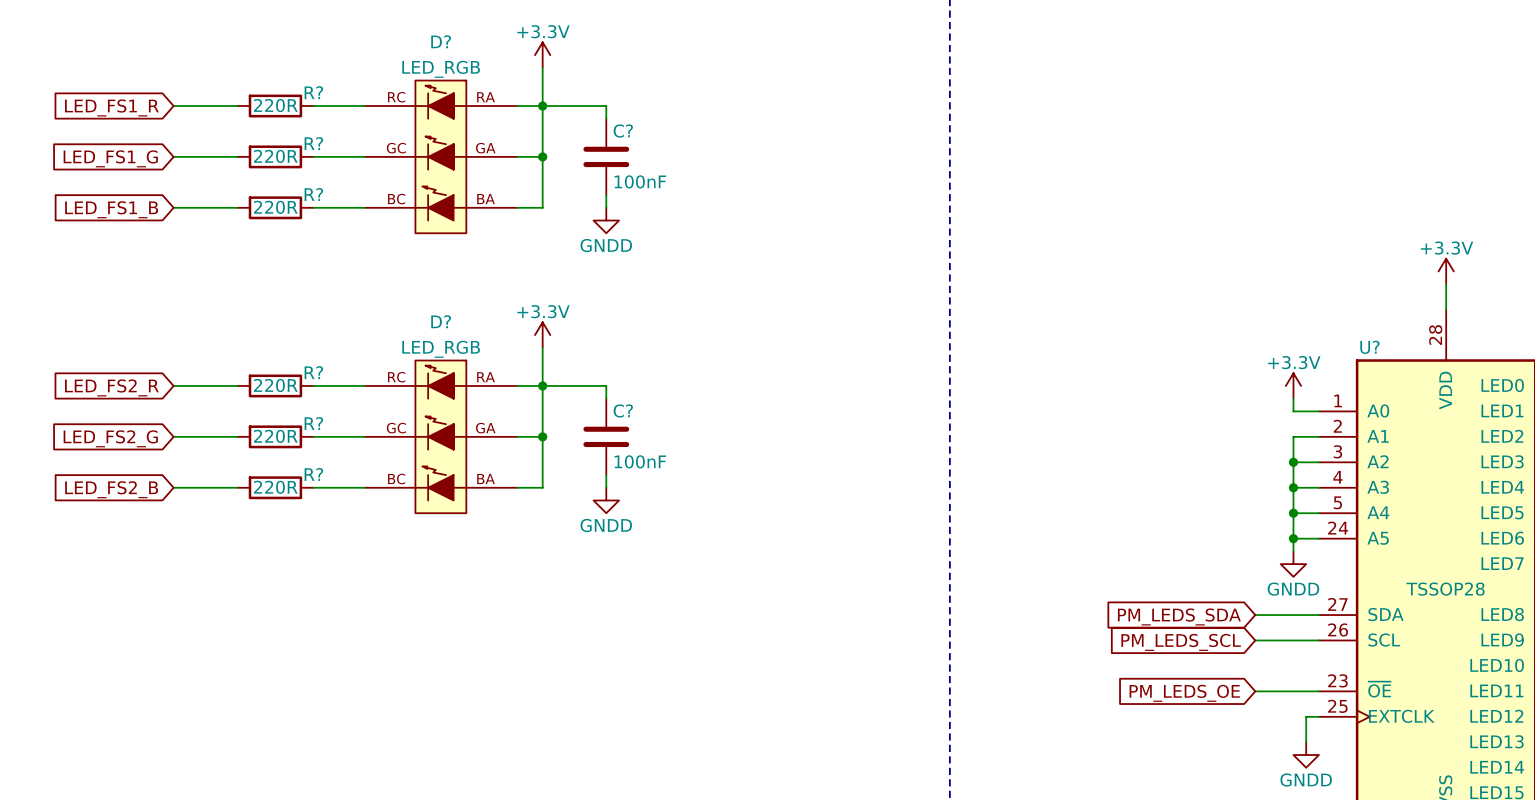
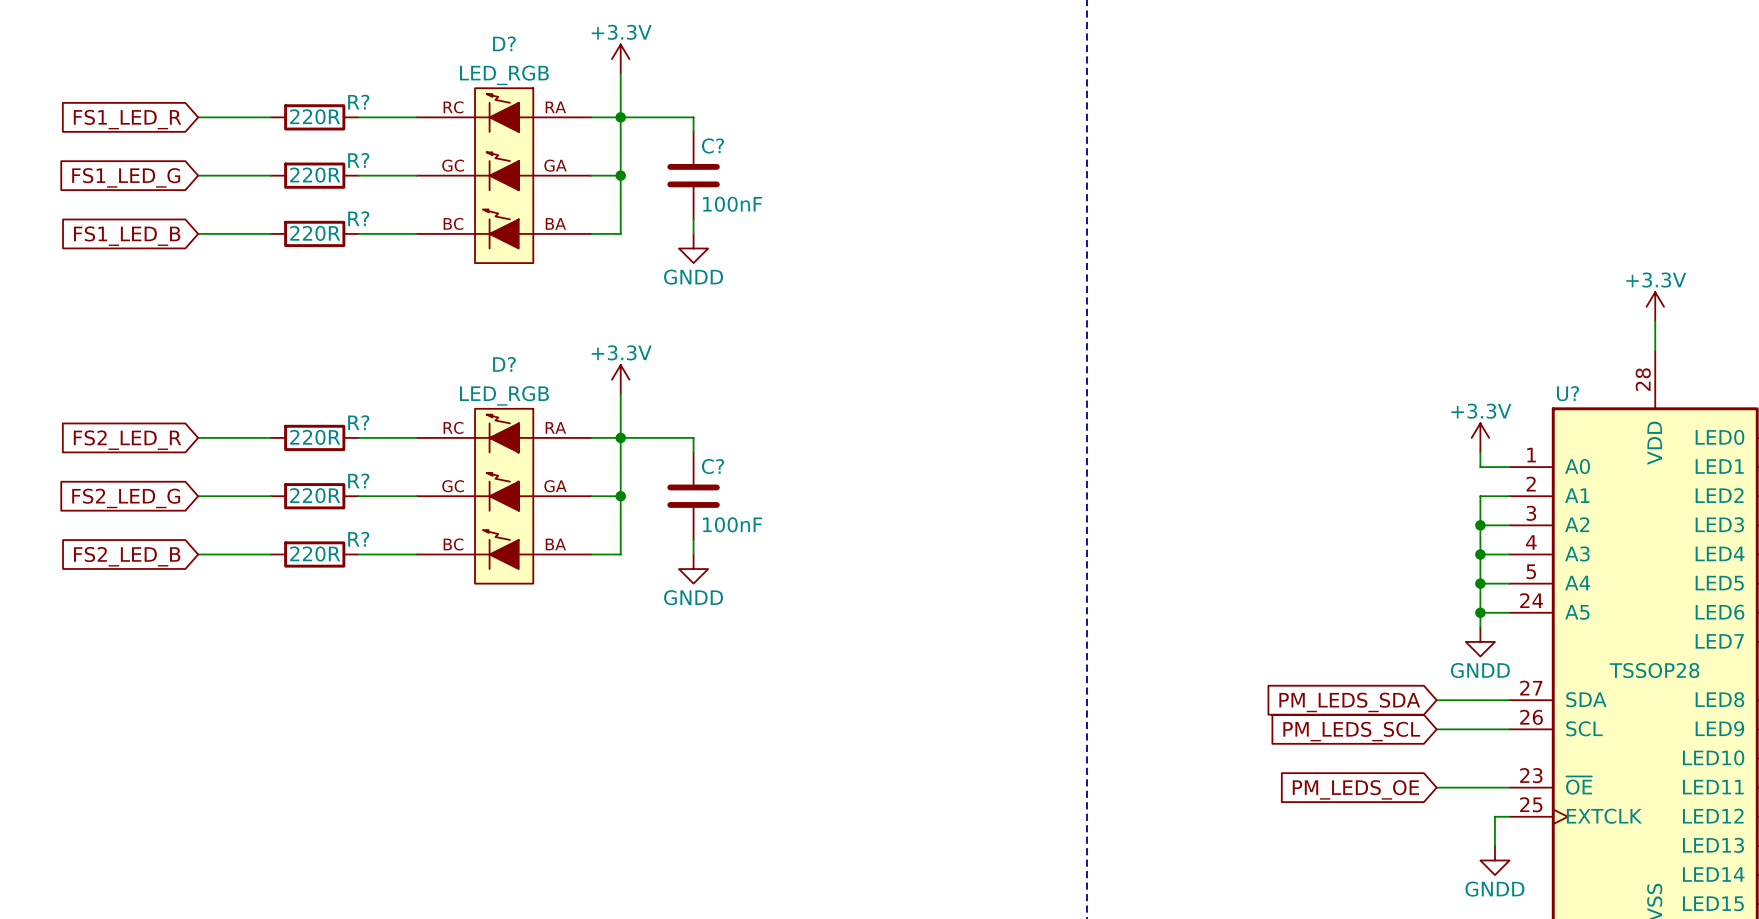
global label: LED_FS1_R (111, 107) -> FS1_LED_R (127, 119)
global label: LED_FS1_G (110, 158) -> FS1_LED_G (126, 177)
global label: LED_FS1_B (111, 209) -> FS1_LED_B (127, 236)
global label: LED_FS2_R (111, 387) -> FS2_LED_R (127, 440)
global label: LED_FS2_G (110, 438) -> FS2_LED_G (126, 498)
global label: LED_FS2_B (111, 489) -> FS2_LED_B (127, 556)

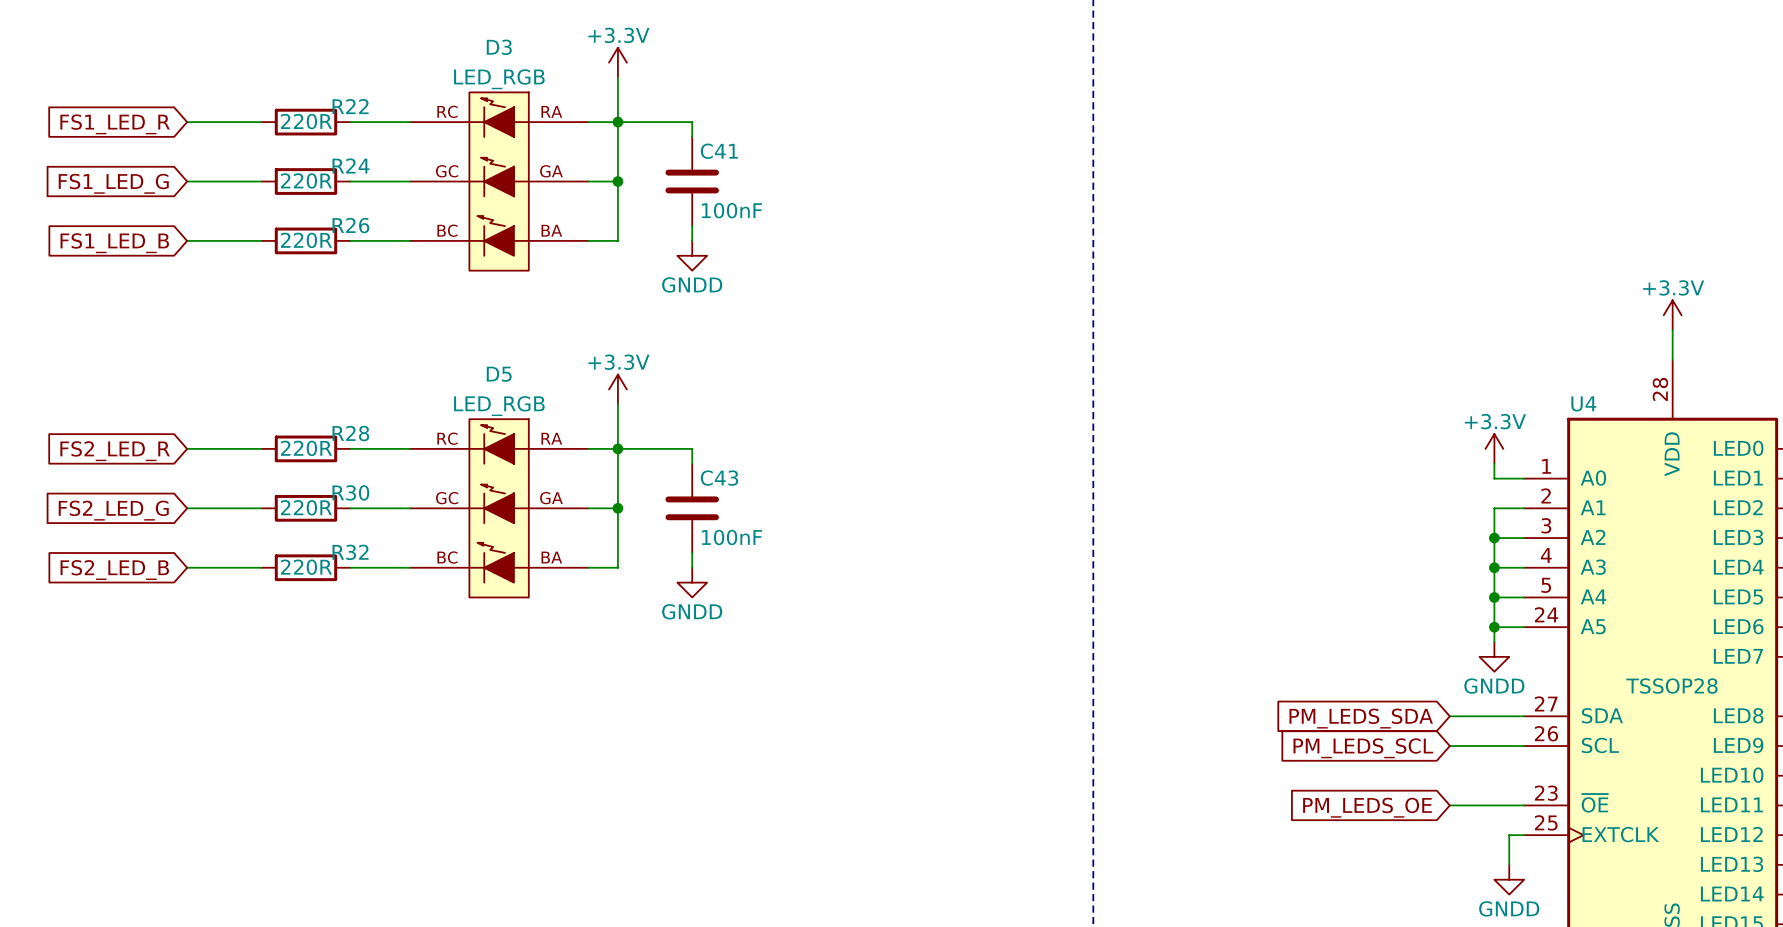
D? name: D? (504, 43) -> D3 (499, 47)
R? name: R? (358, 102) -> R22 (350, 106)
C? name: C? (713, 145) -> C41 (719, 151)
R? name: R? (358, 160) -> R24 (350, 165)
R? name: R? (358, 218) -> R26 (350, 225)
D? name: D? (504, 364) -> D5 (499, 374)
U? name: U? (1567, 393) -> U4 (1583, 403)
R? name: R? (358, 422) -> R28 (350, 433)
C? name: C? (713, 466) -> C43 (719, 478)
R? name: R? (358, 480) -> R30 (350, 492)
R? name: R? (358, 539) -> R32 (350, 552)

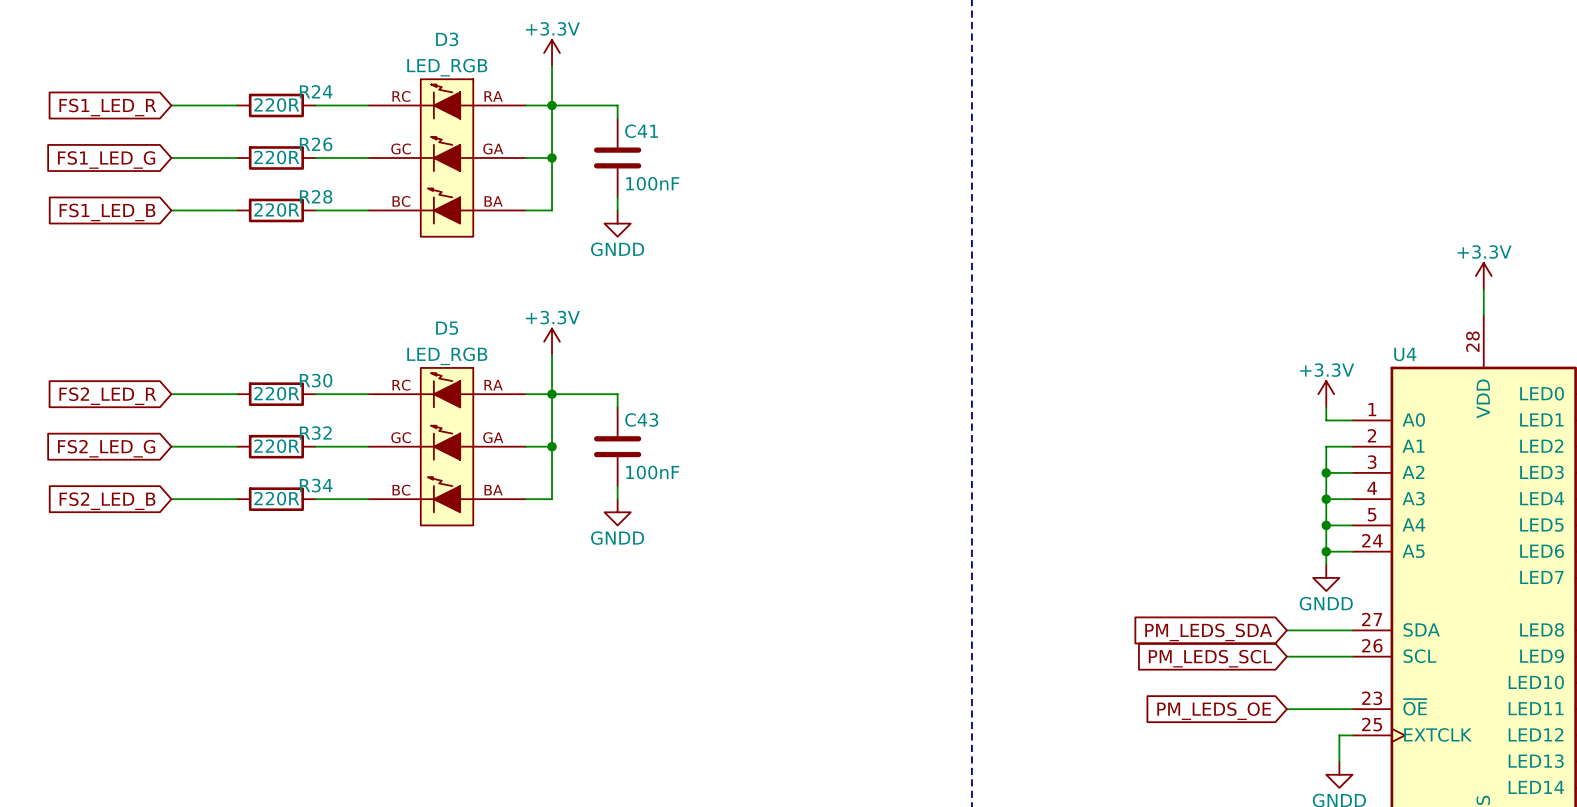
R22 name: R22 (350, 106) -> R24 (316, 91)
R24 name: R24 (350, 165) -> R26 (316, 144)
R26 name: R26 (350, 225) -> R28 (316, 196)
R28 name: R28 (350, 433) -> R30 (316, 380)
R30 name: R30 (350, 492) -> R32 (315, 433)
R32 name: R32 (350, 552) -> R34 (316, 485)
U4 text: TSSOP28 (1671, 686) -> none

